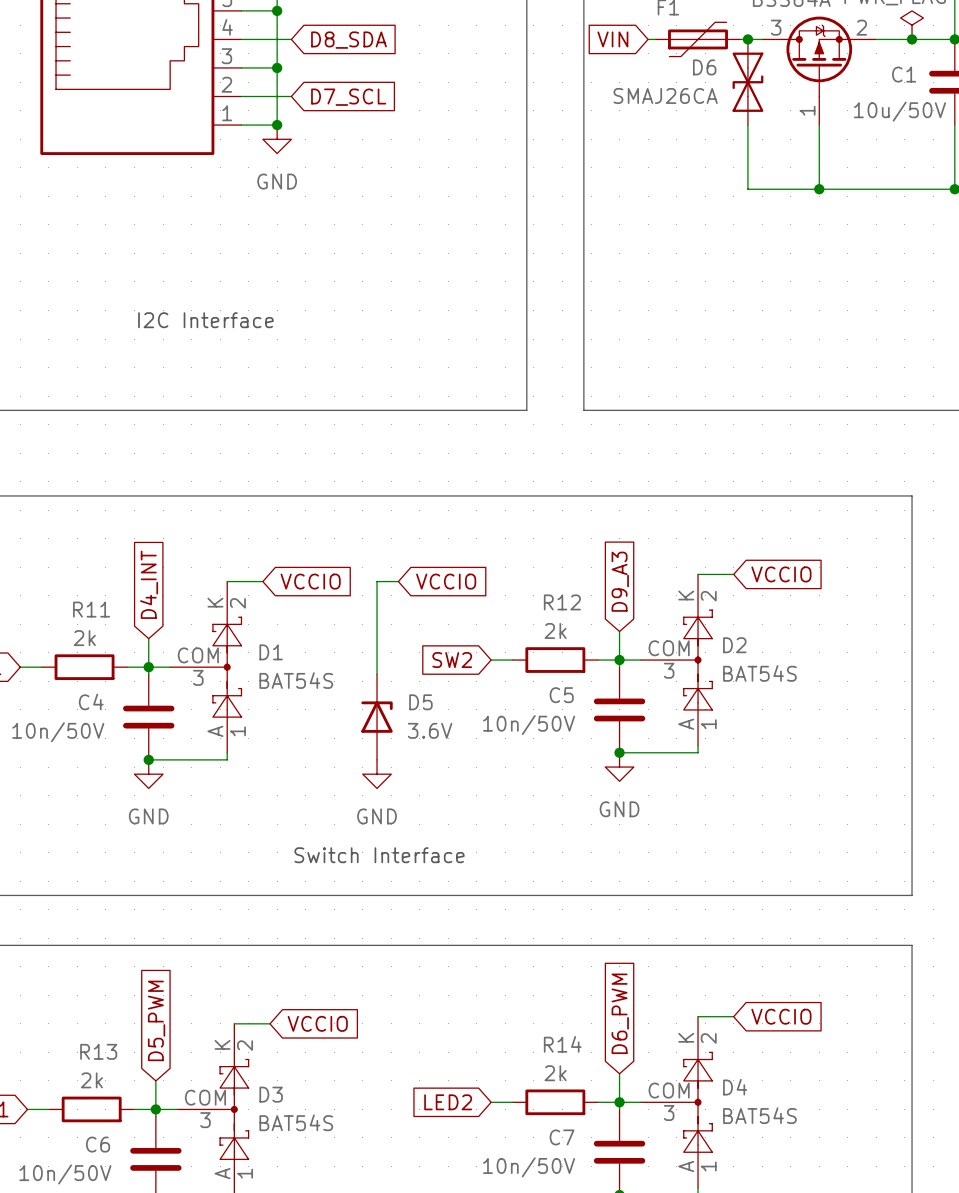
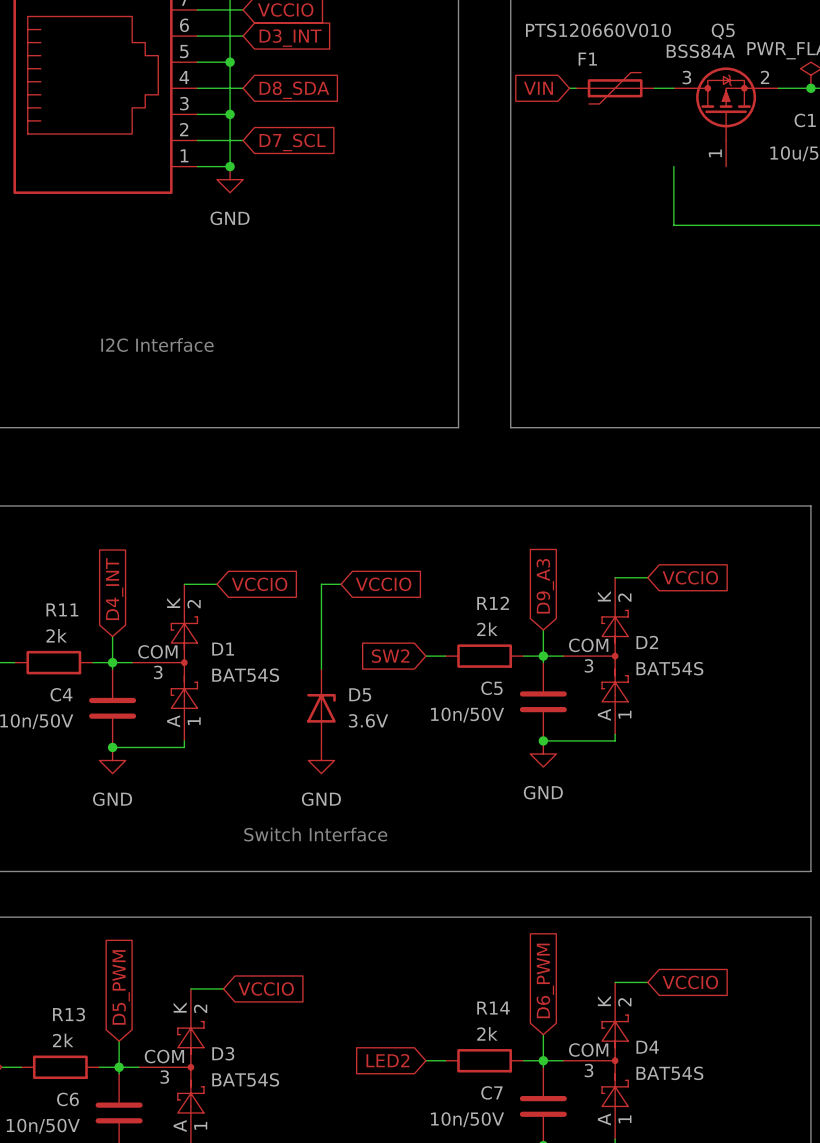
junction: (747, 39) -> none
D6: SMAJ26CA (747, 82) -> none
wire: (747, 125) (747, 189) (762, 189) -> (673, 166) (673, 225)
wire: (819, 125) (819, 189) -> none
junction: (819, 189) -> none

